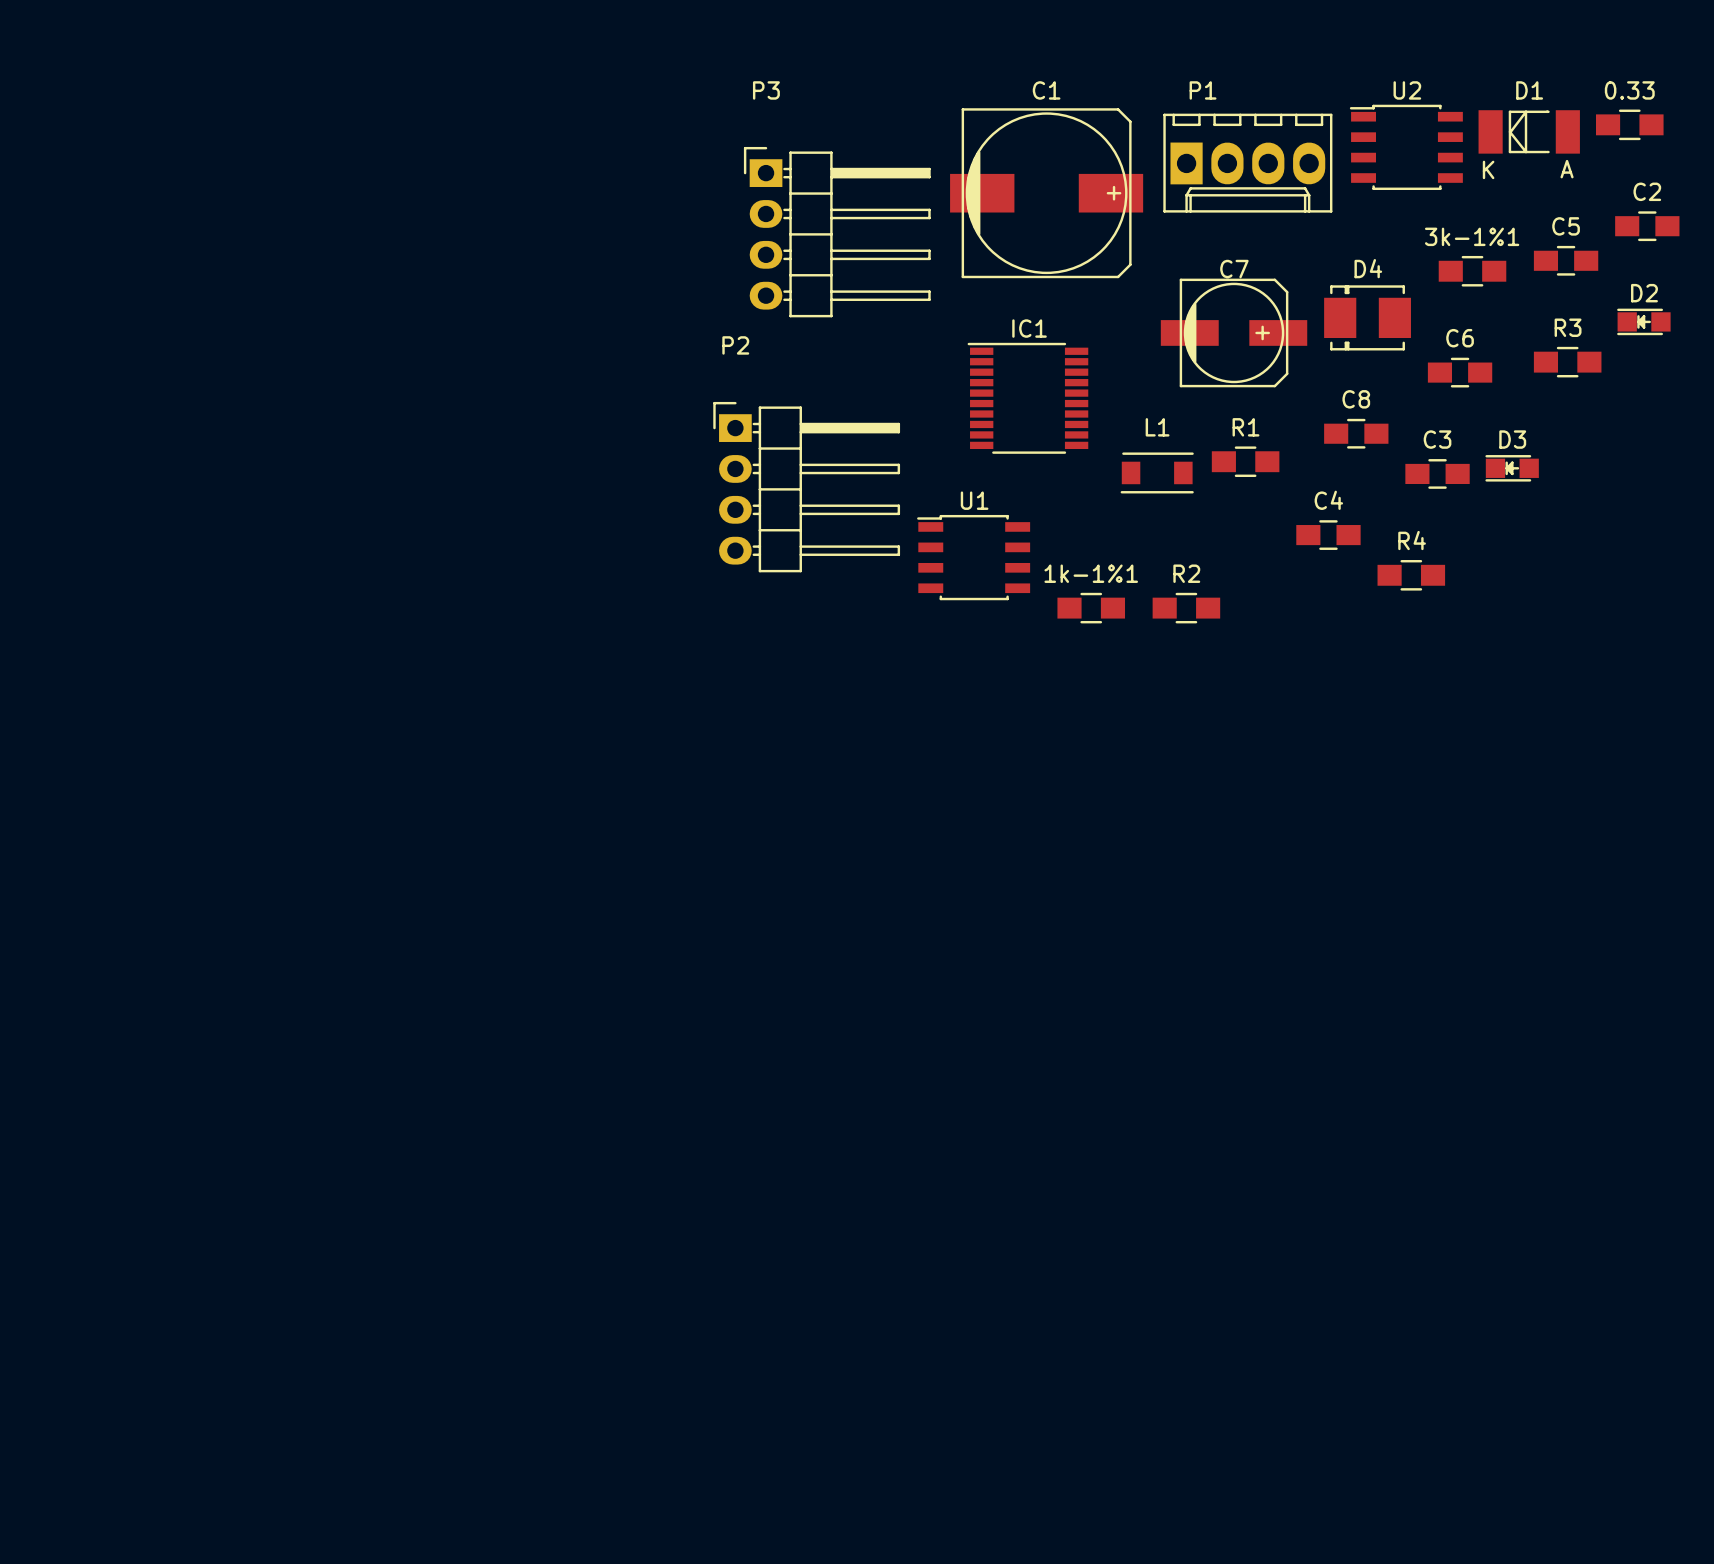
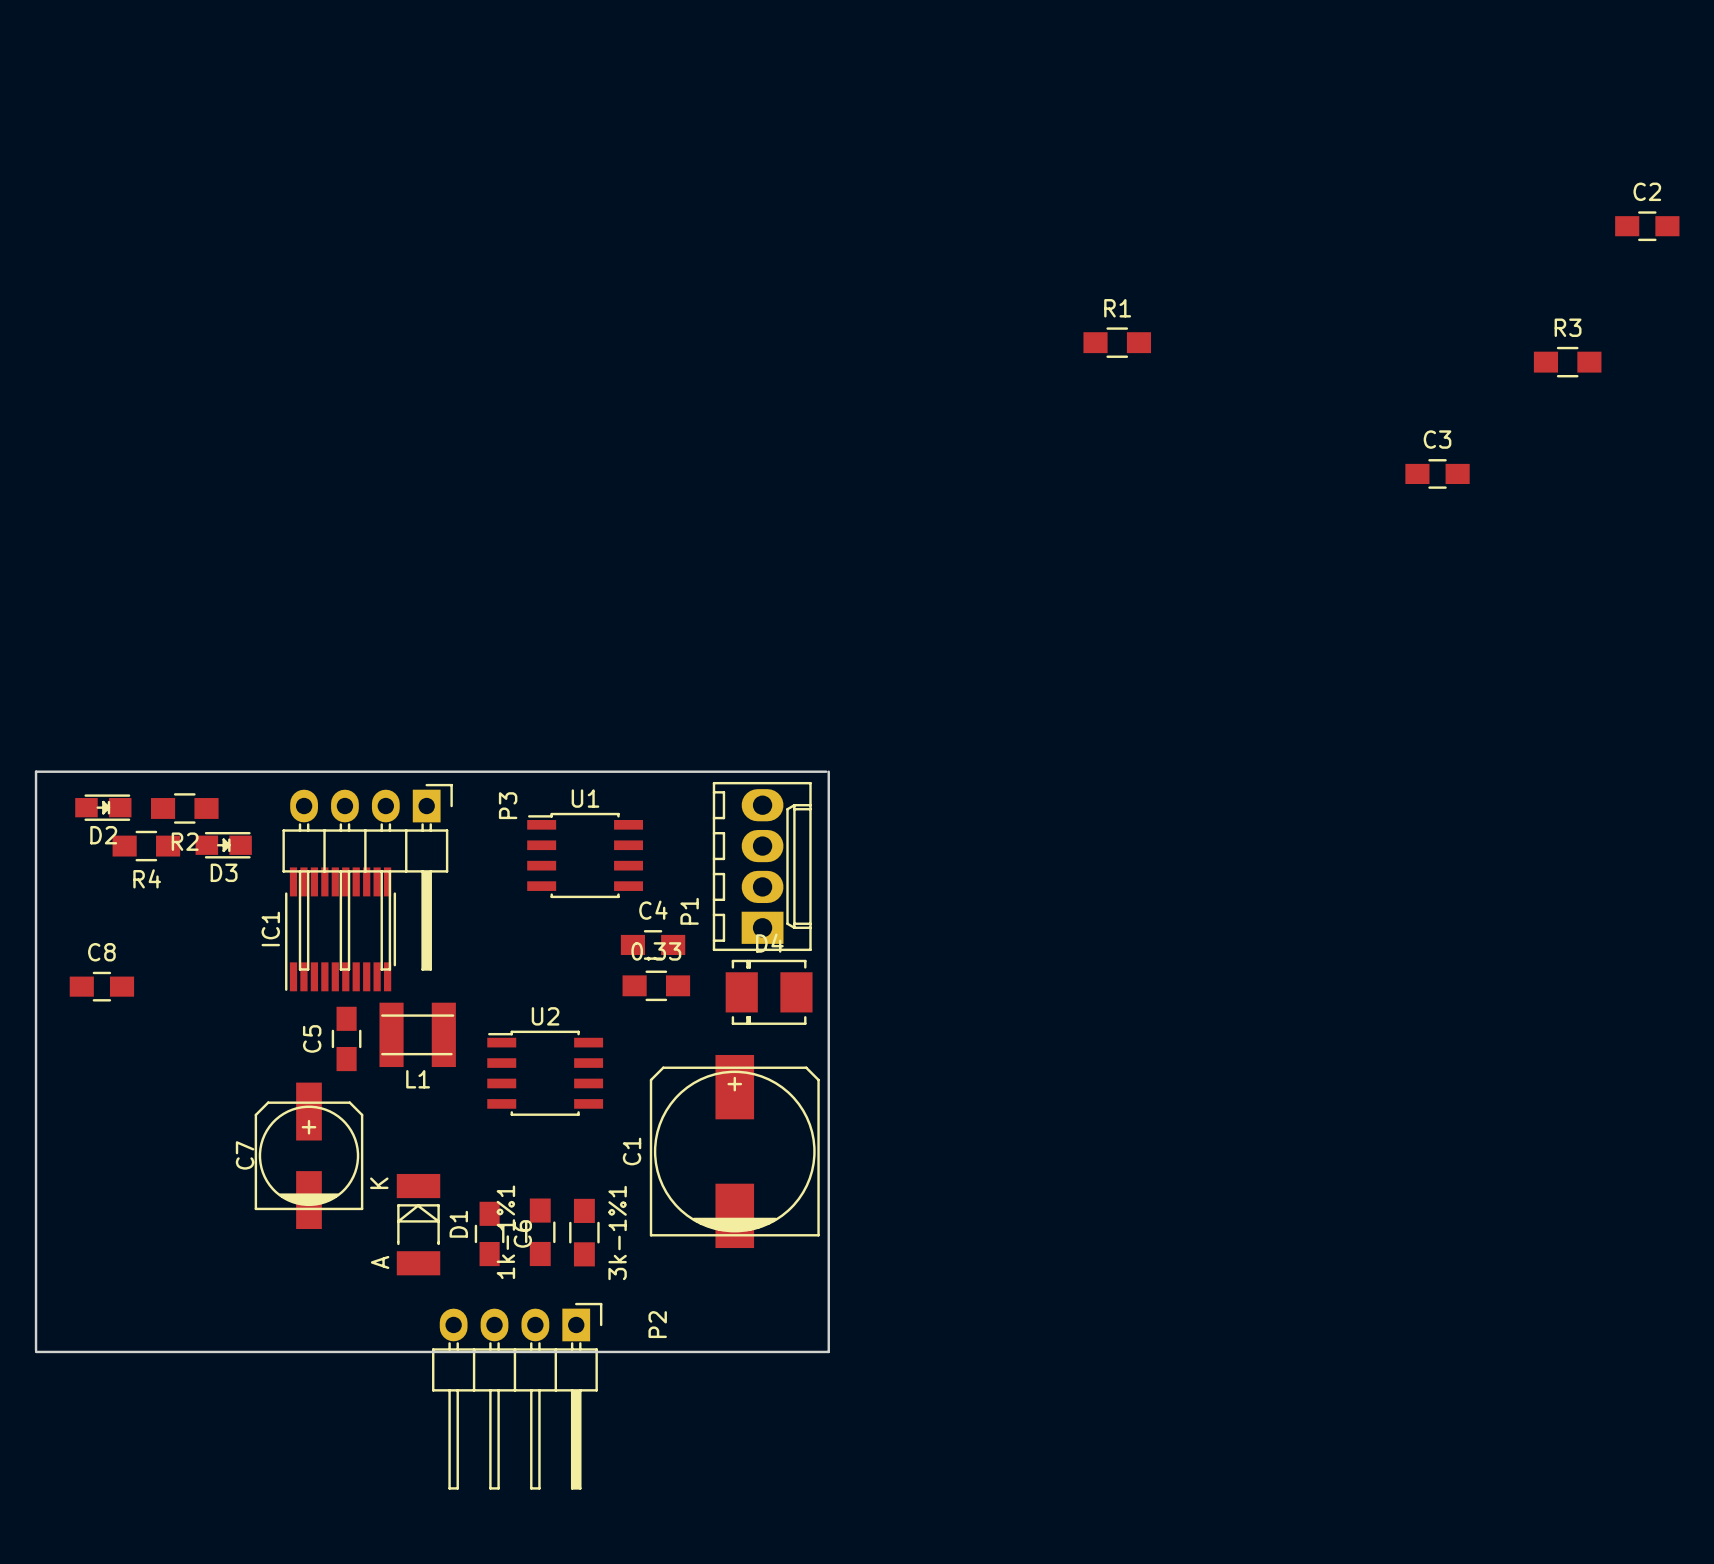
U2 footprint: [1349, 104, 1463, 190] -> [487, 1030, 604, 1116]
0.33 position: (1629, 124) -> (656, 985)
D1 rotation: 0° (1529, 131) -> 90° clockwise (418, 1224)
D1 position: (1529, 131) -> (418, 1224)
P1 rotation: 0° (1247, 163) -> 90° counterclockwise (762, 866)
P1 position: (1247, 163) -> (762, 866)
C1 rotation: 0° (1046, 193) -> 90° counterclockwise (734, 1151)
C1 position: (1046, 193) -> (734, 1151)
C5 name position: C5 (1566, 226) -> C5 (312, 1038)
P3 rotation: 0° (837, 232) -> 90° clockwise (367, 877)
P3 position: (837, 232) -> (367, 877)
C5 rotation: 0° (1566, 260) -> 90° clockwise (346, 1038)
C5 position: (1566, 260) -> (346, 1038)
3k-1%1 rotation: 0° (1472, 271) -> 90° clockwise (584, 1232)
3k-1%1 position: (1472, 271) -> (584, 1232)
D2 name position: D2 (1644, 293) -> D2 (103, 835)
D2 footprint: [1617, 308, 1671, 336] -> [75, 794, 132, 821]
D4 position: (1367, 317) -> (769, 992)
IC1 name position: IC1 (1029, 328) -> IC1 (270, 928)
C7 rotation: 0° (1234, 332) -> 90° counterclockwise (308, 1155)
C7 position: (1234, 332) -> (308, 1155)
IC1 footprint: [967, 342, 1089, 454] -> [285, 867, 397, 992]
C6 rotation: 0° (1460, 372) -> 90° clockwise (489, 1233)
C6 position: (1460, 372) -> (489, 1233)
L1 name position: L1 (1157, 427) -> L1 (418, 1079)
C8 position: (1356, 433) -> (101, 986)
D3 name position: D3 (1512, 439) -> D3 (224, 872)
L1 footprint: [1120, 452, 1194, 494] -> [379, 1002, 456, 1068]
D3 footprint: [1485, 455, 1539, 482] -> [195, 831, 252, 859]
R1 position: (1245, 461) -> (1117, 342)
P2 rotation: 0° (806, 487) -> 90° clockwise (517, 1396)
P2 position: (806, 487) -> (517, 1396)
U1 footprint: [917, 514, 1031, 601] -> [527, 812, 644, 899]
C4 position: (1328, 535) -> (653, 944)
R4 name position: R4 (1412, 540) -> R4 (147, 878)
1k-1%1 name position: 1k-1%1 (1091, 573) -> 1k-1%1 (505, 1232)
R2 name position: R2 (1186, 573) -> R2 (185, 841)
R4 position: (1411, 575) -> (146, 846)
1k-1%1 rotation: 0° (1091, 608) -> 90° clockwise (540, 1232)
1k-1%1 position: (1091, 608) -> (540, 1232)
R2 position: (1186, 608) -> (184, 808)
board edge: none -> (826, 771) (36, 771) (36, 1350)
board edge: none -> (828, 771) (828, 1351) (36, 1351)

